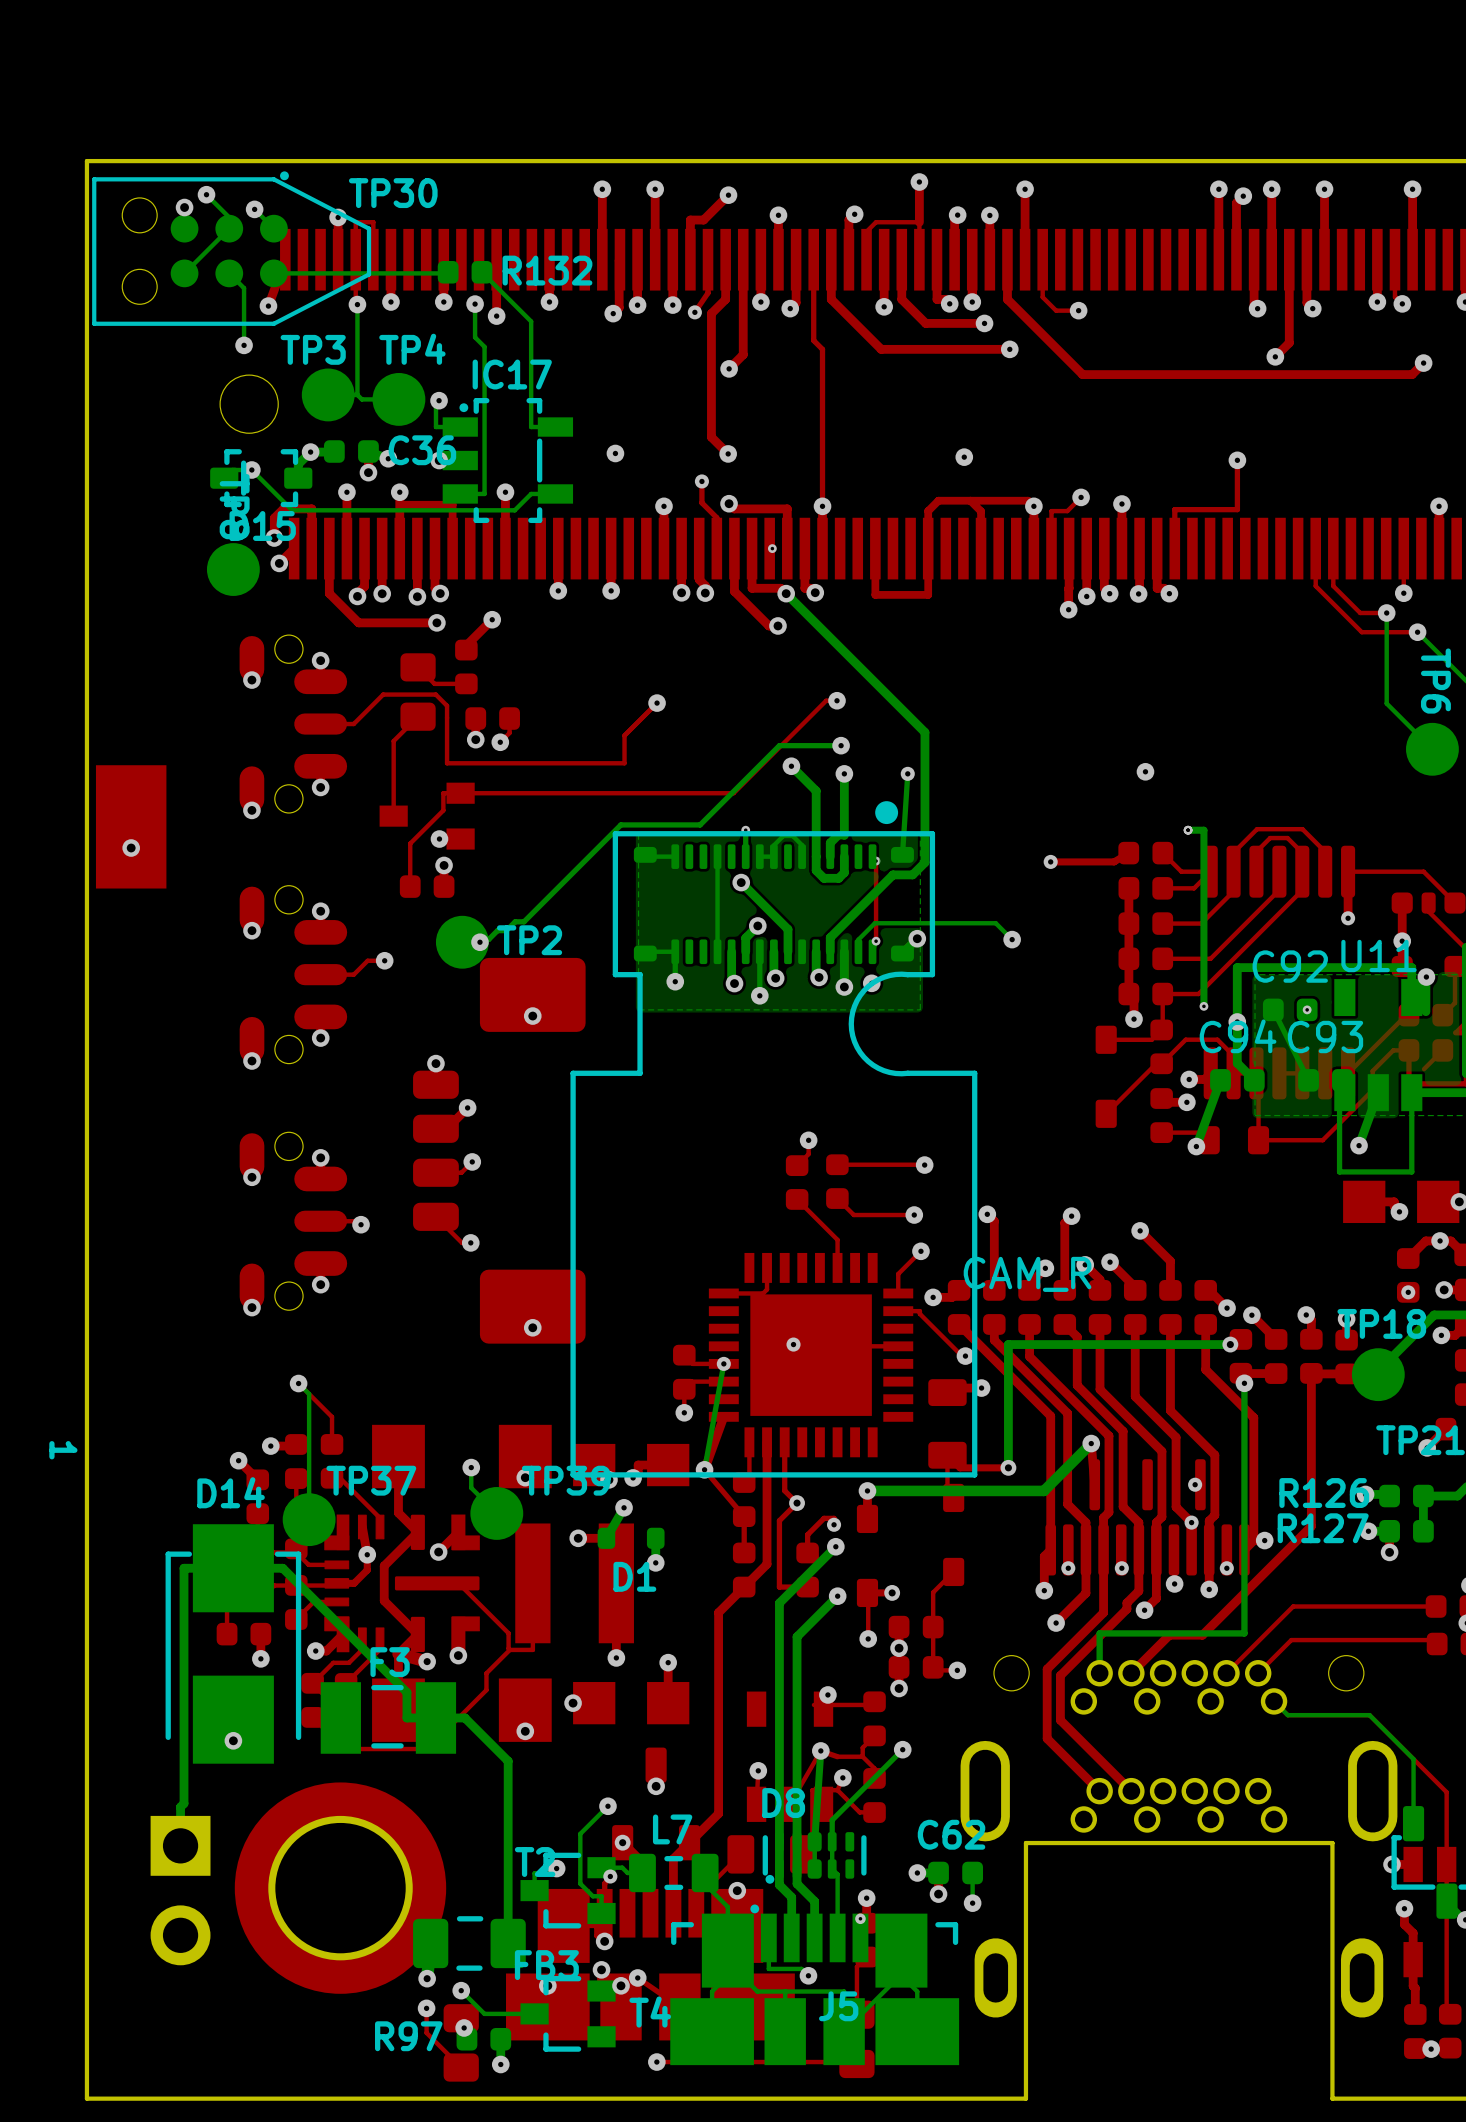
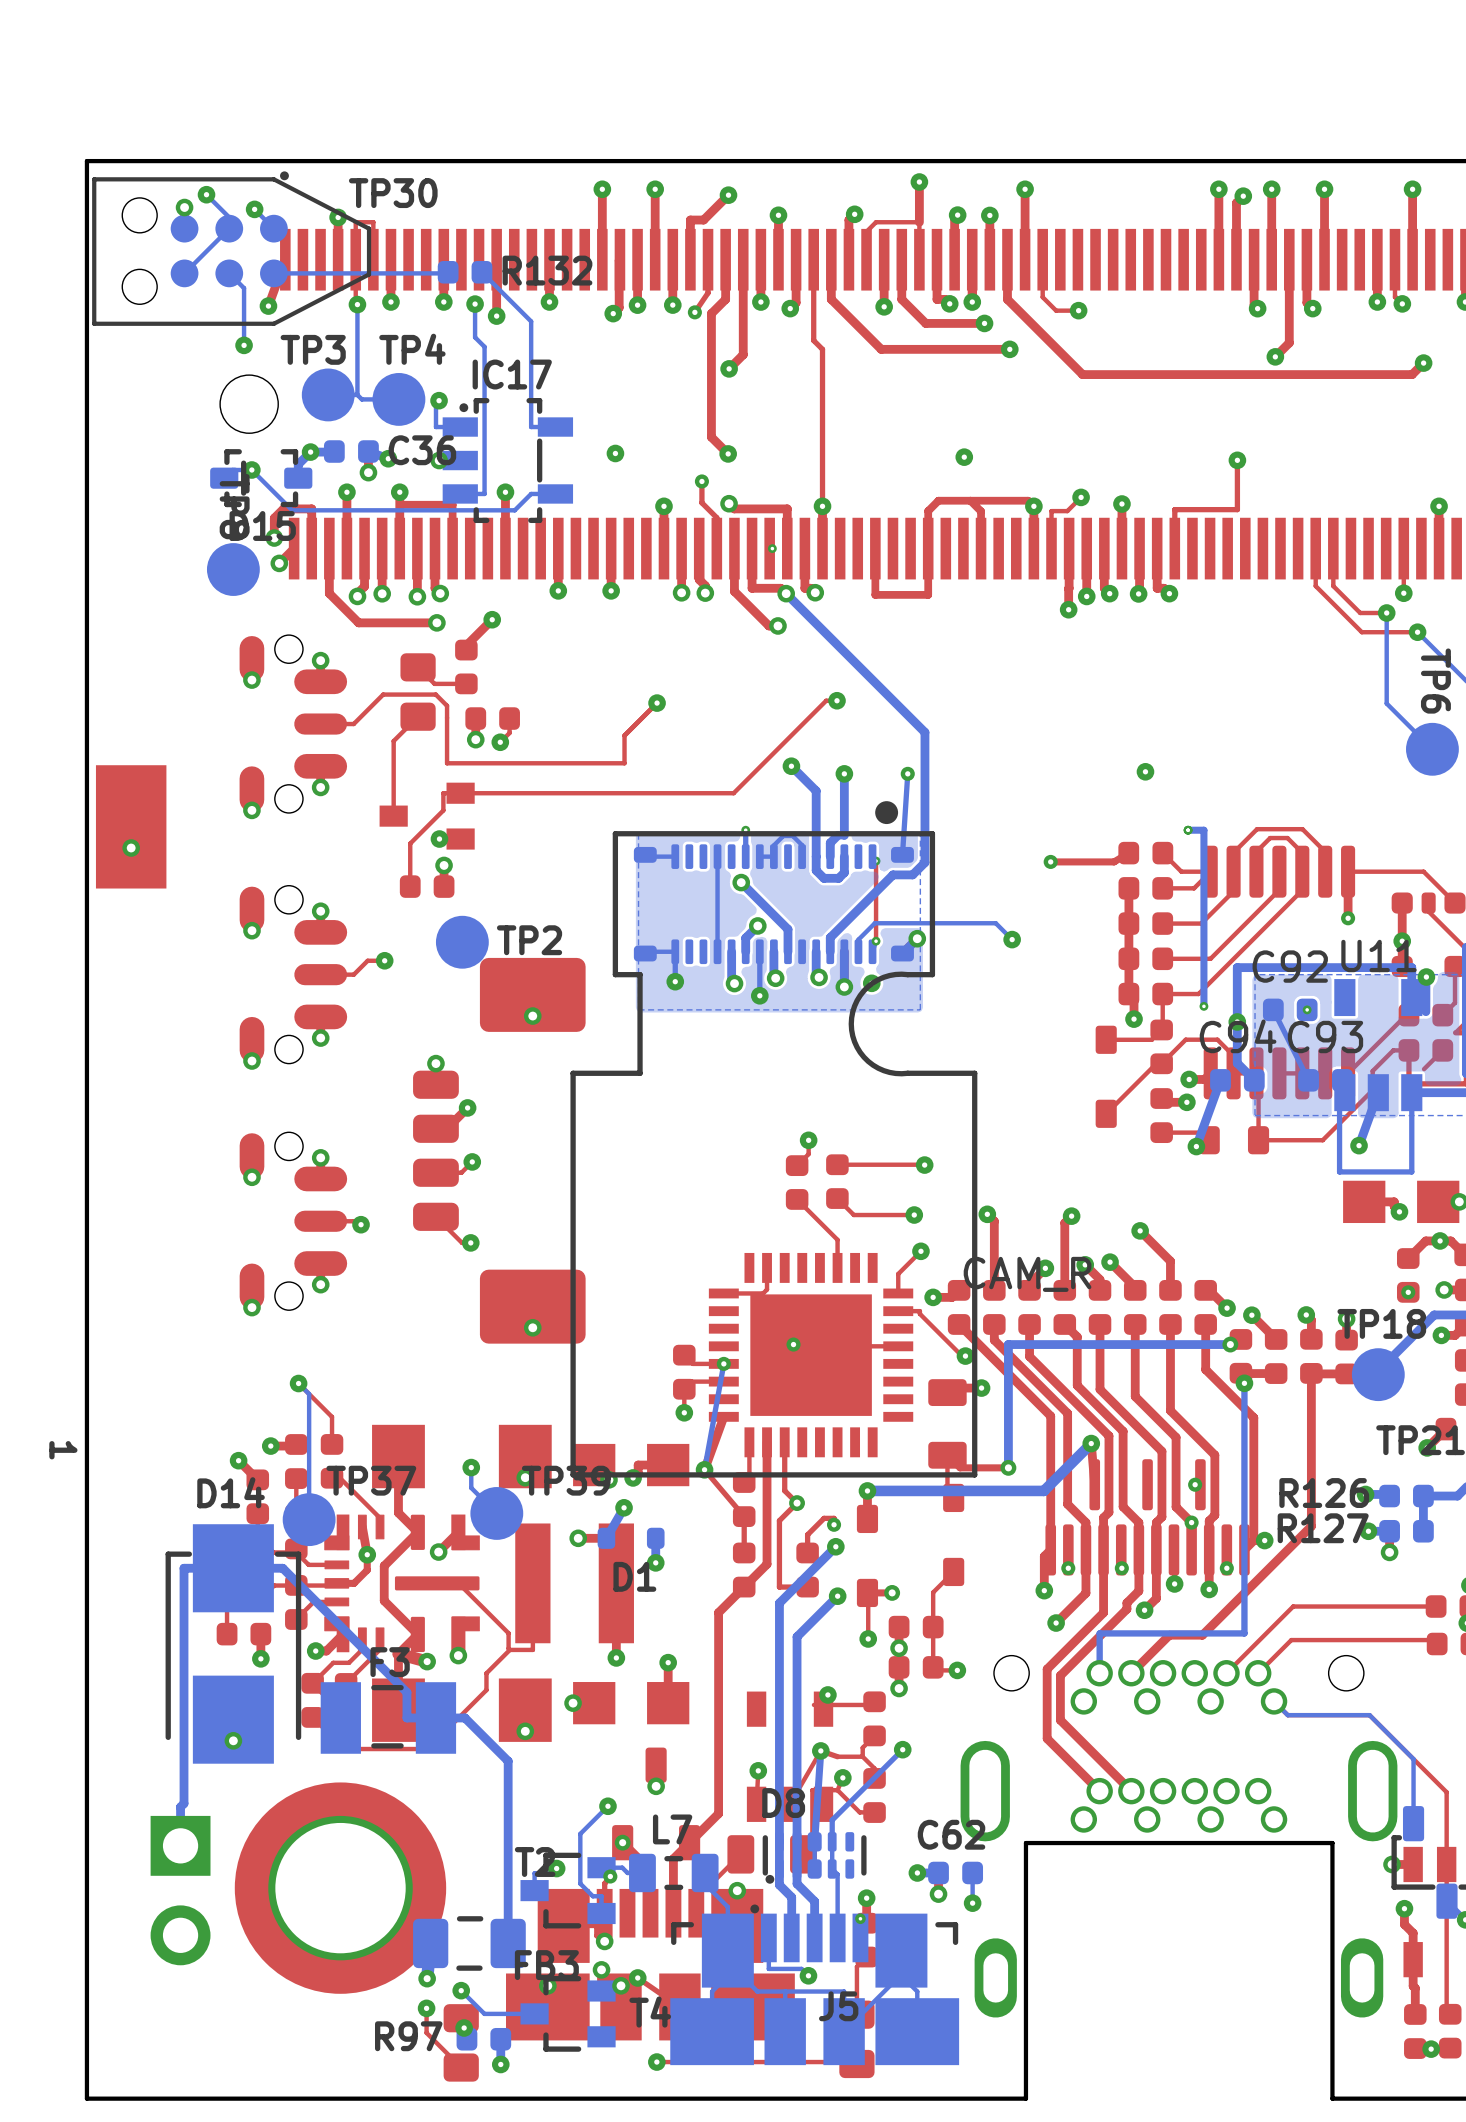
bottom track: (841, 745) (779, 745) (700, 824) (620, 824) (524, 921) (515, 921) (506, 930) (497, 930) (488, 939) (479, 939) (479, 942) -> none
via: (841, 745) -> none
via: (479, 942) -> none

